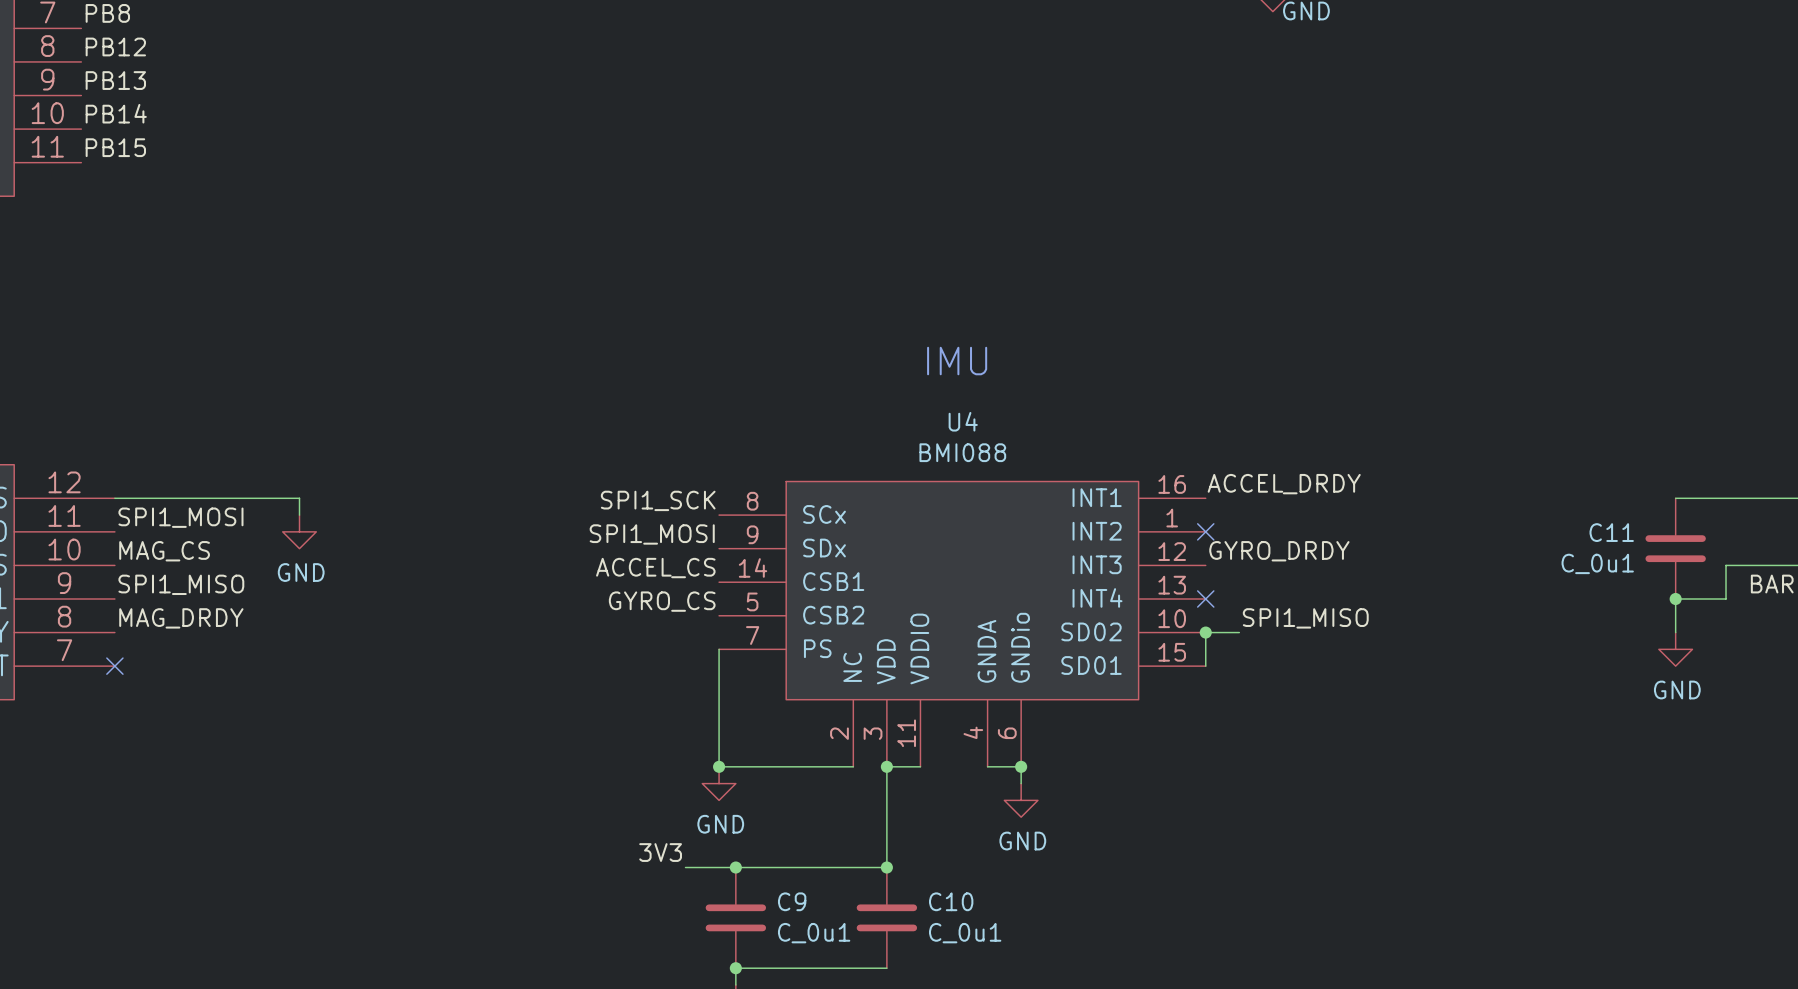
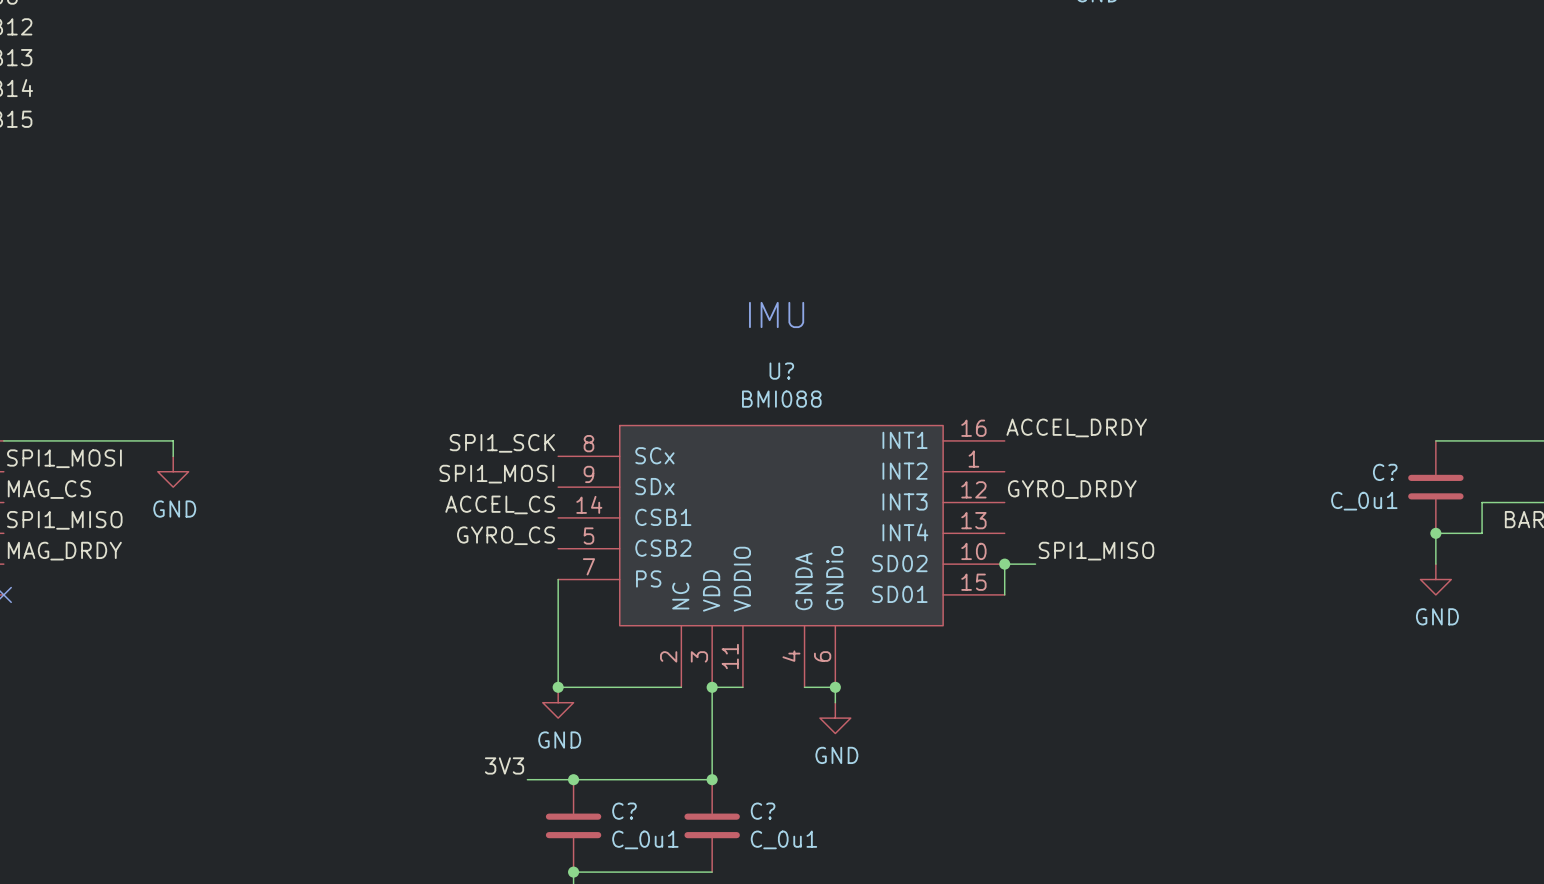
U4 name: U4 (963, 421) -> U? (781, 371)
no-connect mark: (1205, 531) -> none
C11 name: C11 (1611, 532) -> C? (1385, 472)
no-connect mark: (1205, 599) -> none
C9 name: C9 (792, 901) -> C? (624, 811)
C10 name: C10 (951, 901) -> C? (763, 811)

